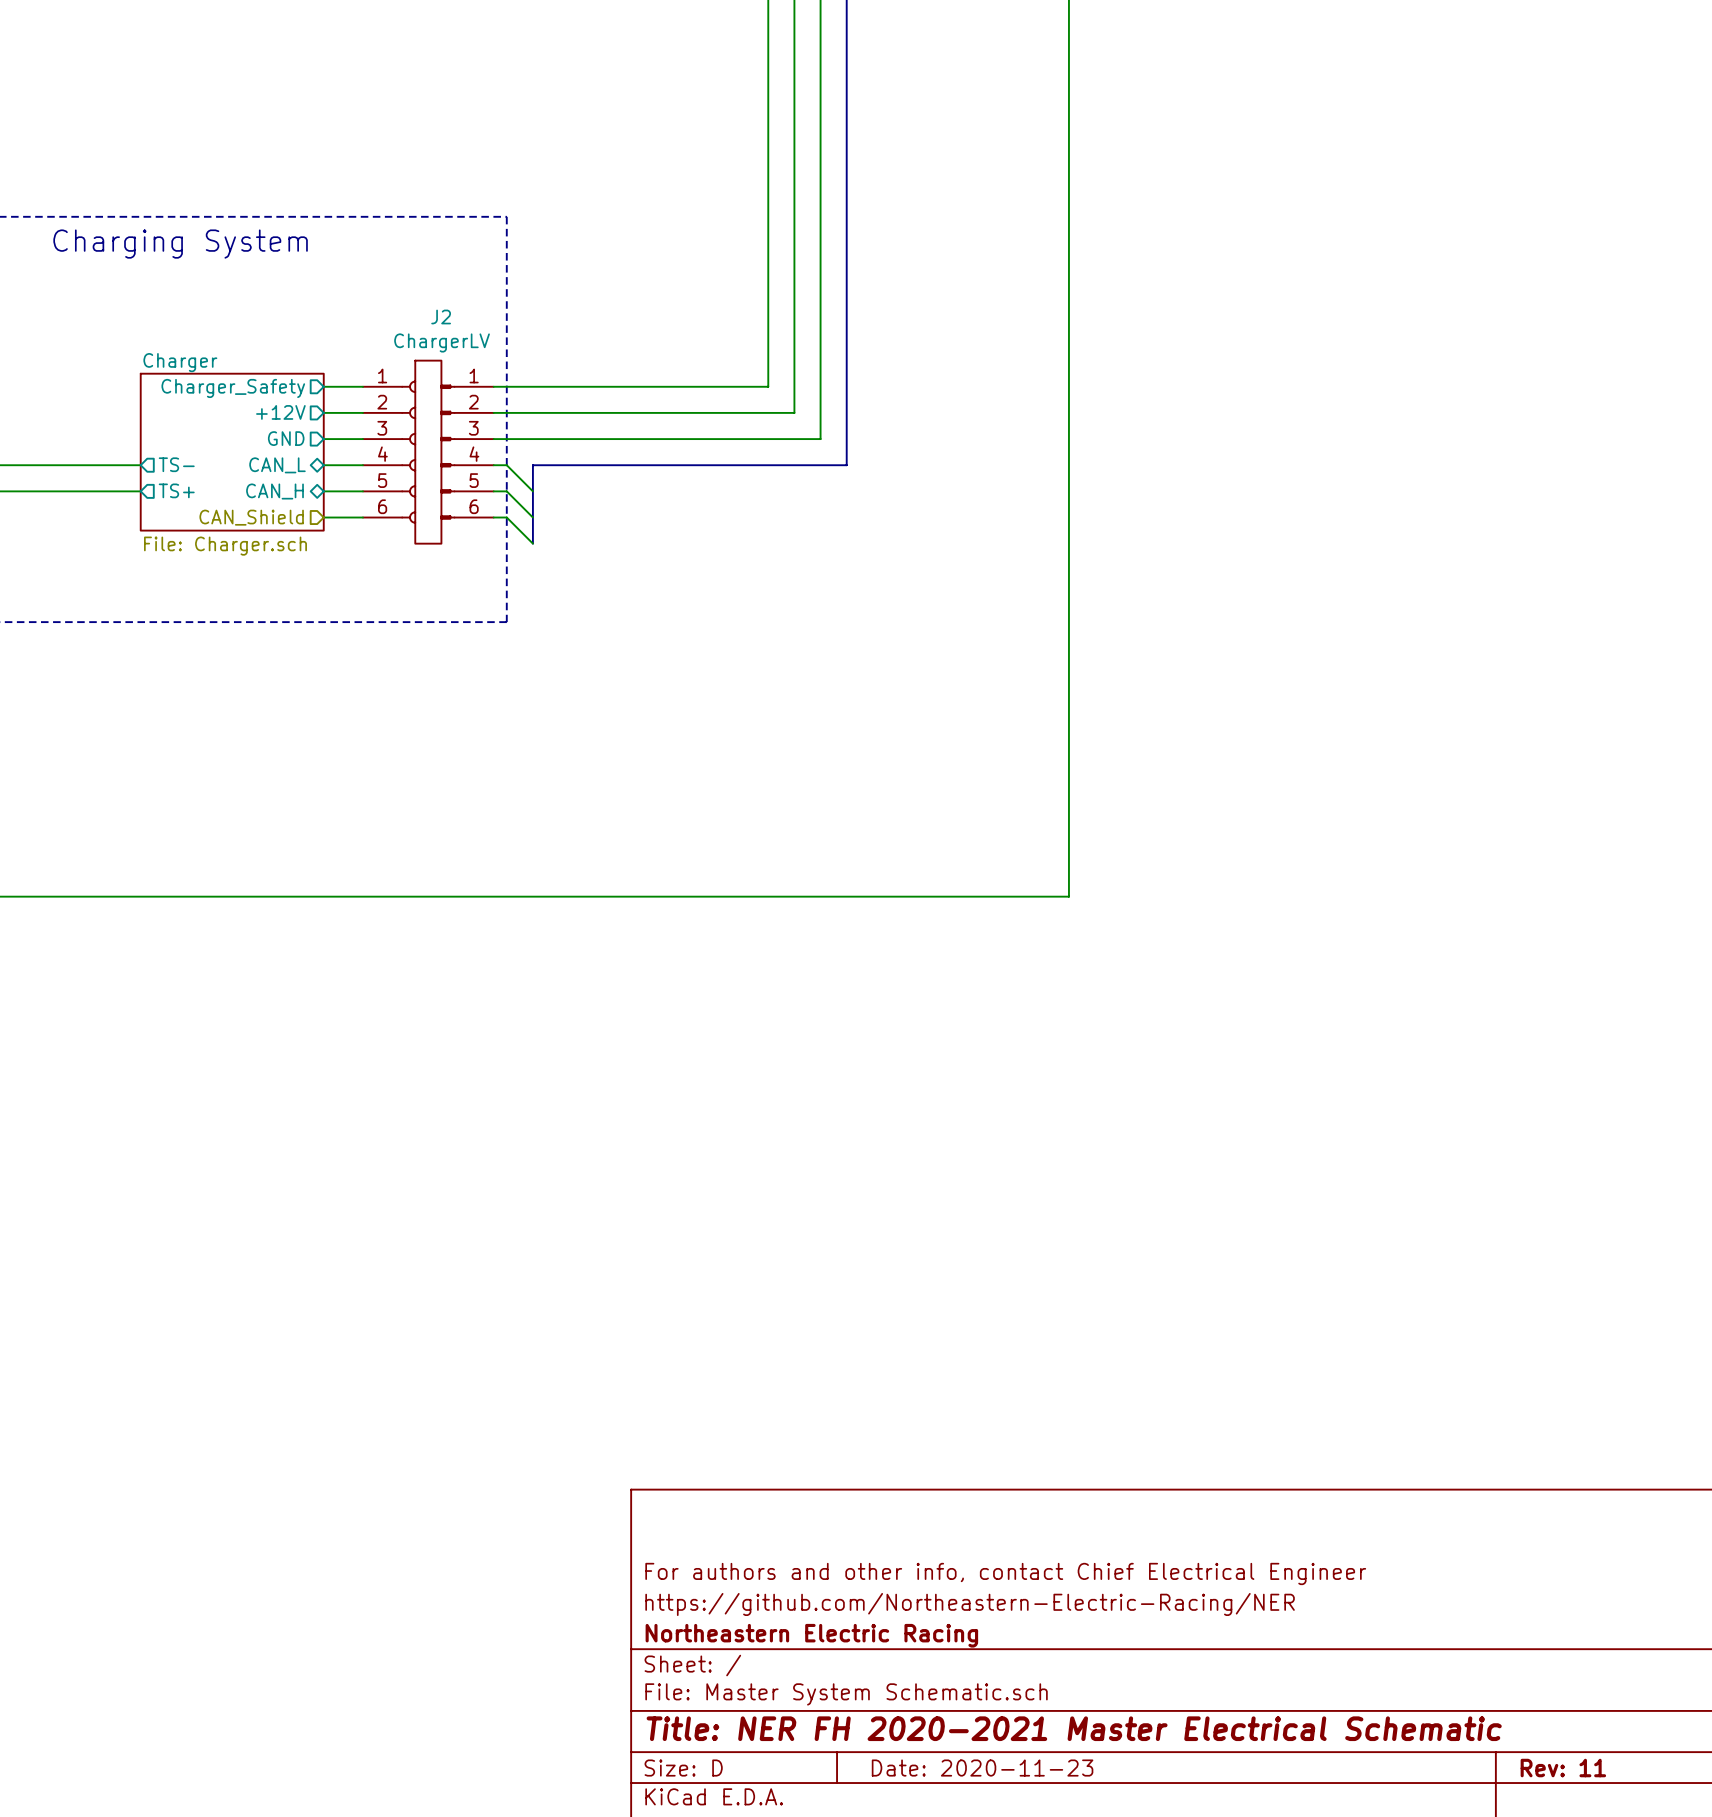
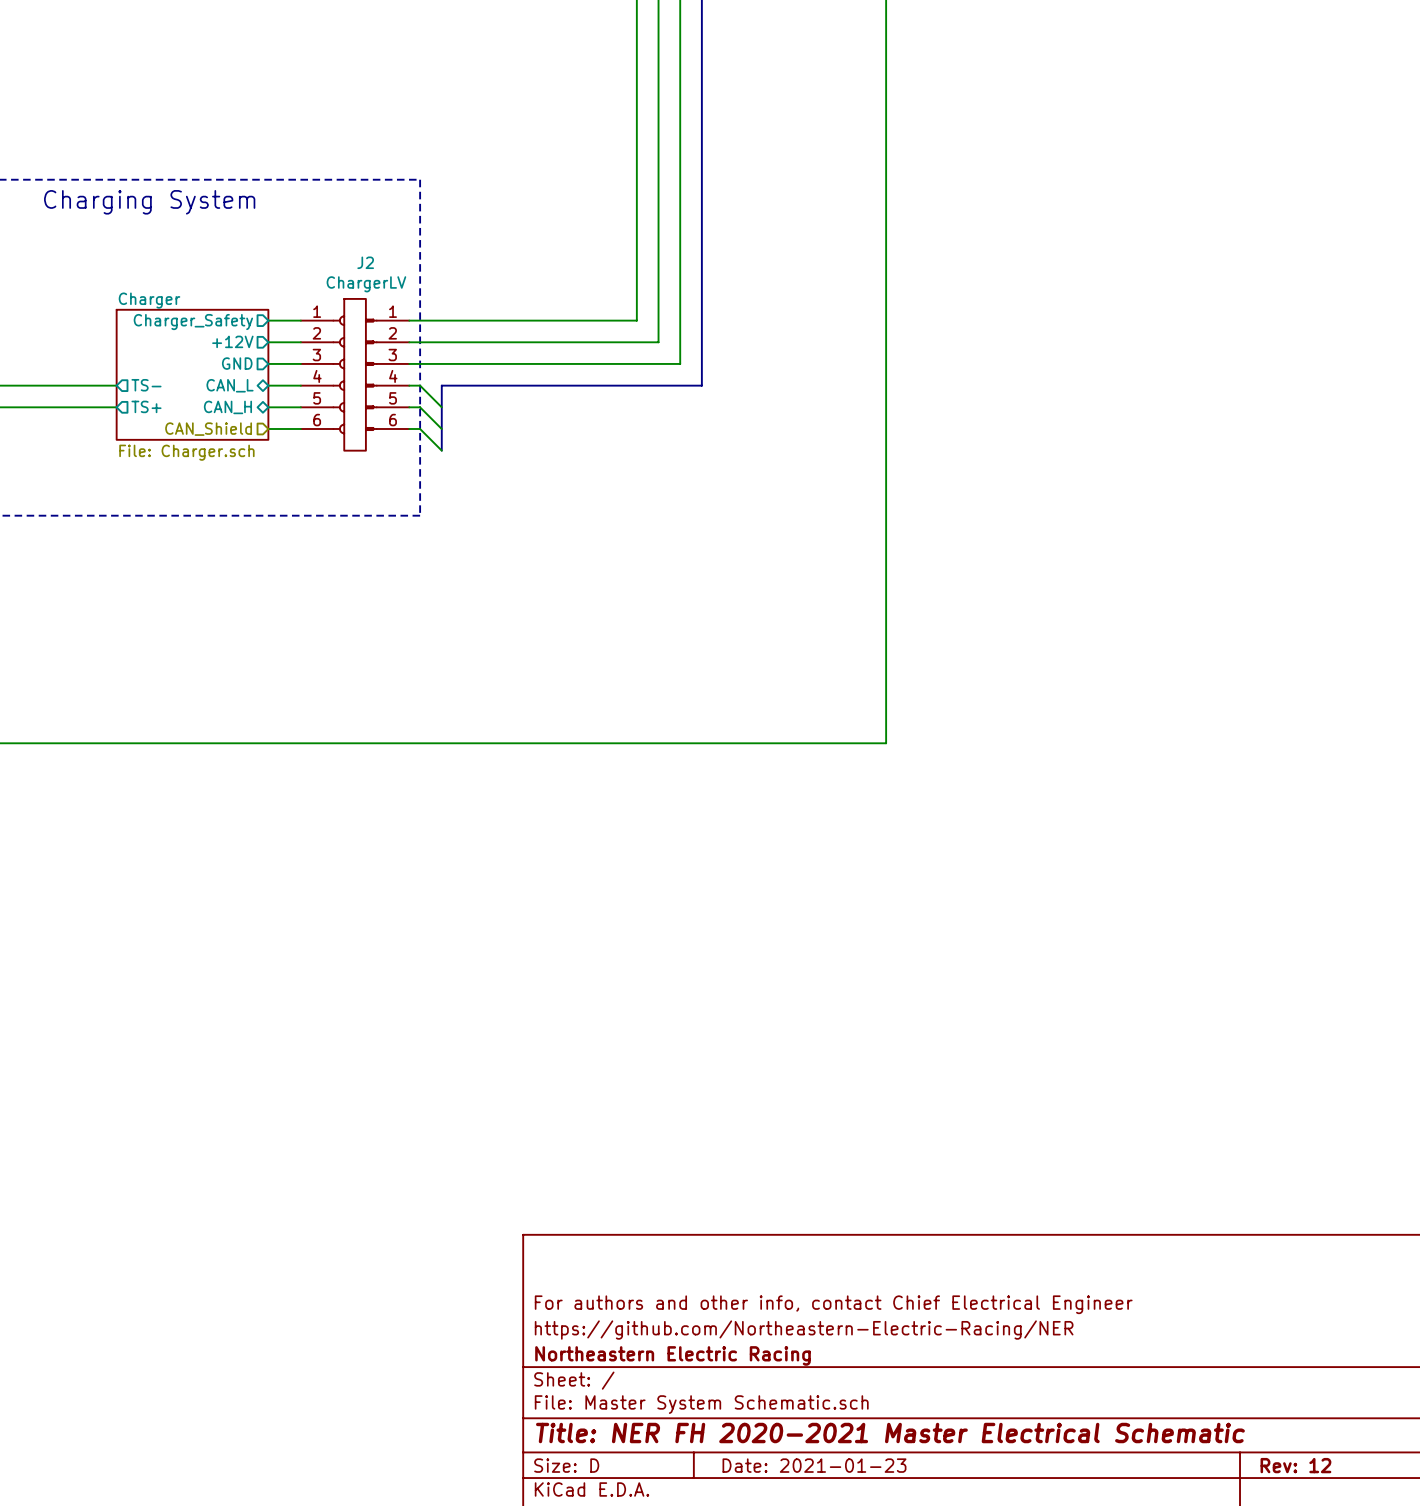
title block: Date: 2020-11-23 (982, 1768) -> Date: 2021-01-23 (814, 1465)
title block: Rev: 11 (1563, 1768) -> Rev: 12 (1295, 1465)

